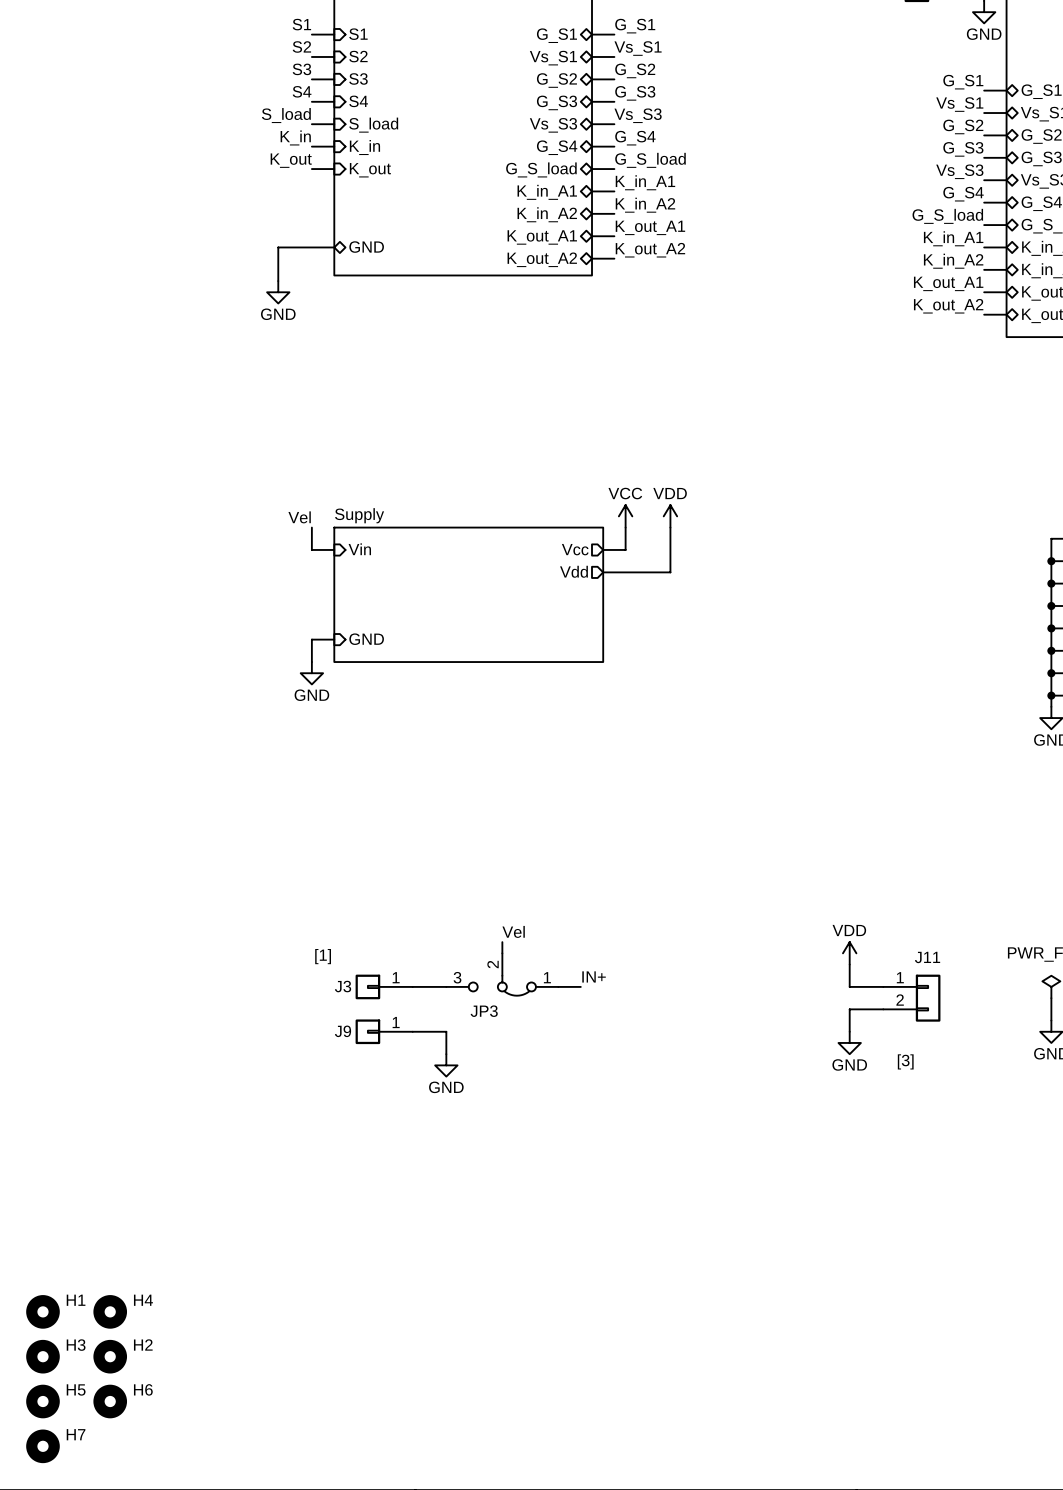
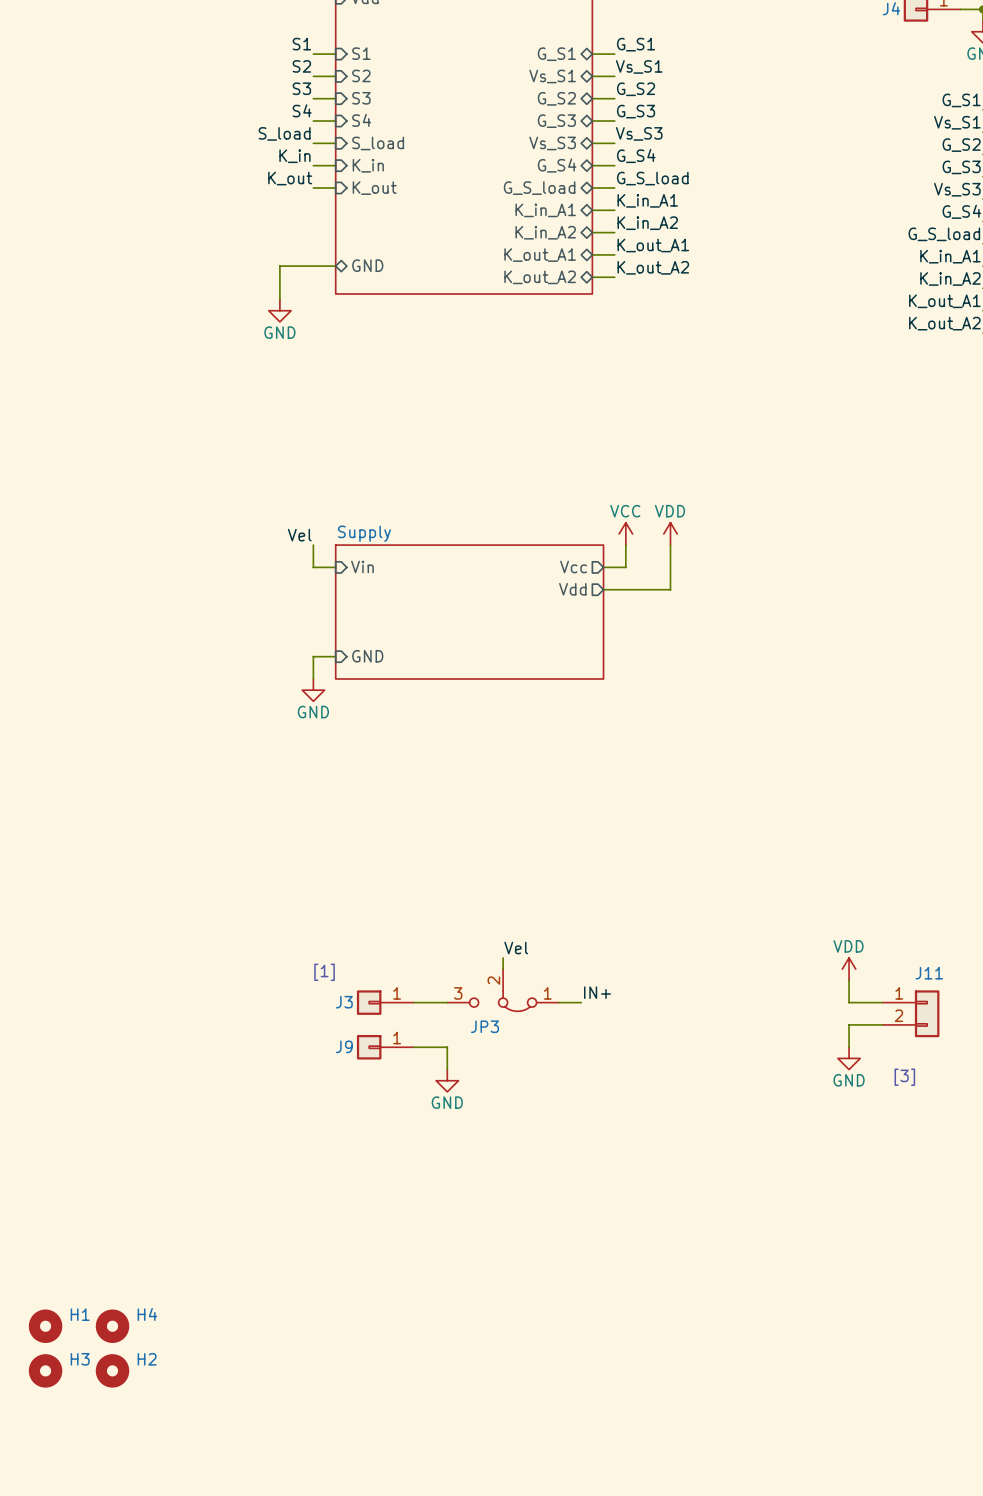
H5: (42, 1401) -> none
H6: (110, 1401) -> none
H7: (42, 1446) -> none

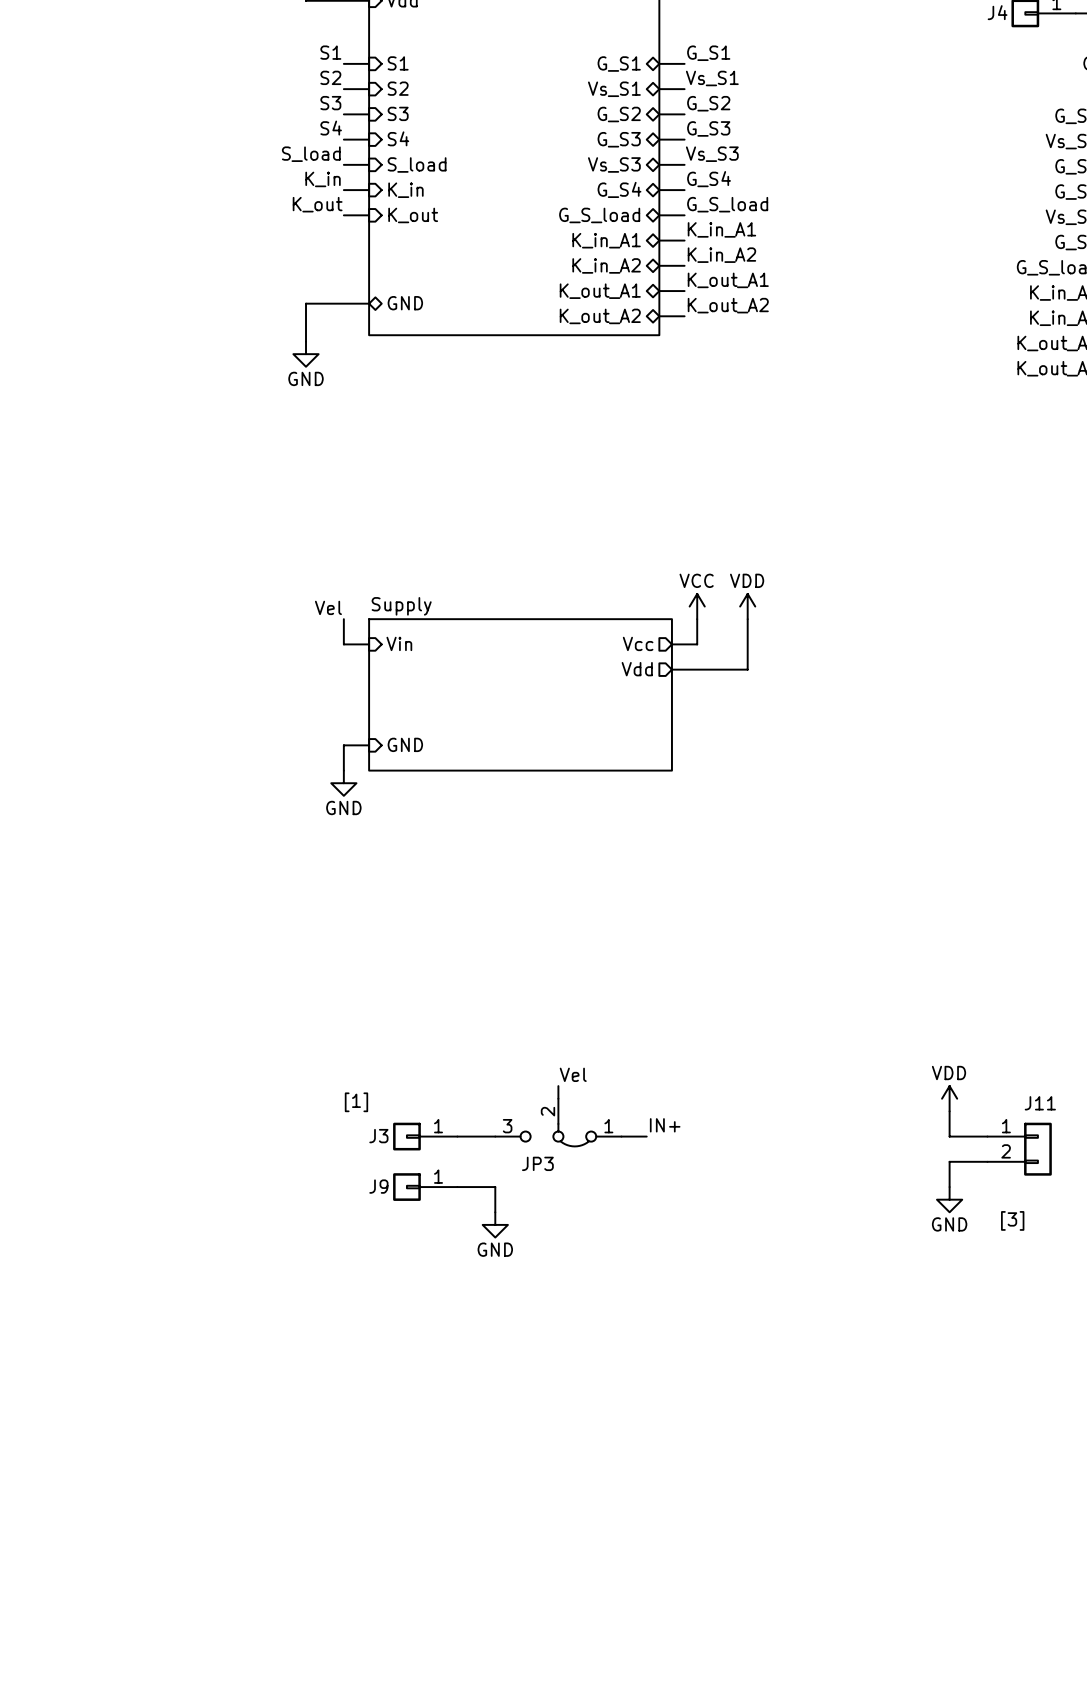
H1: (45, 1326) -> none
H4: (112, 1326) -> none
H3: (45, 1370) -> none
H2: (112, 1370) -> none

